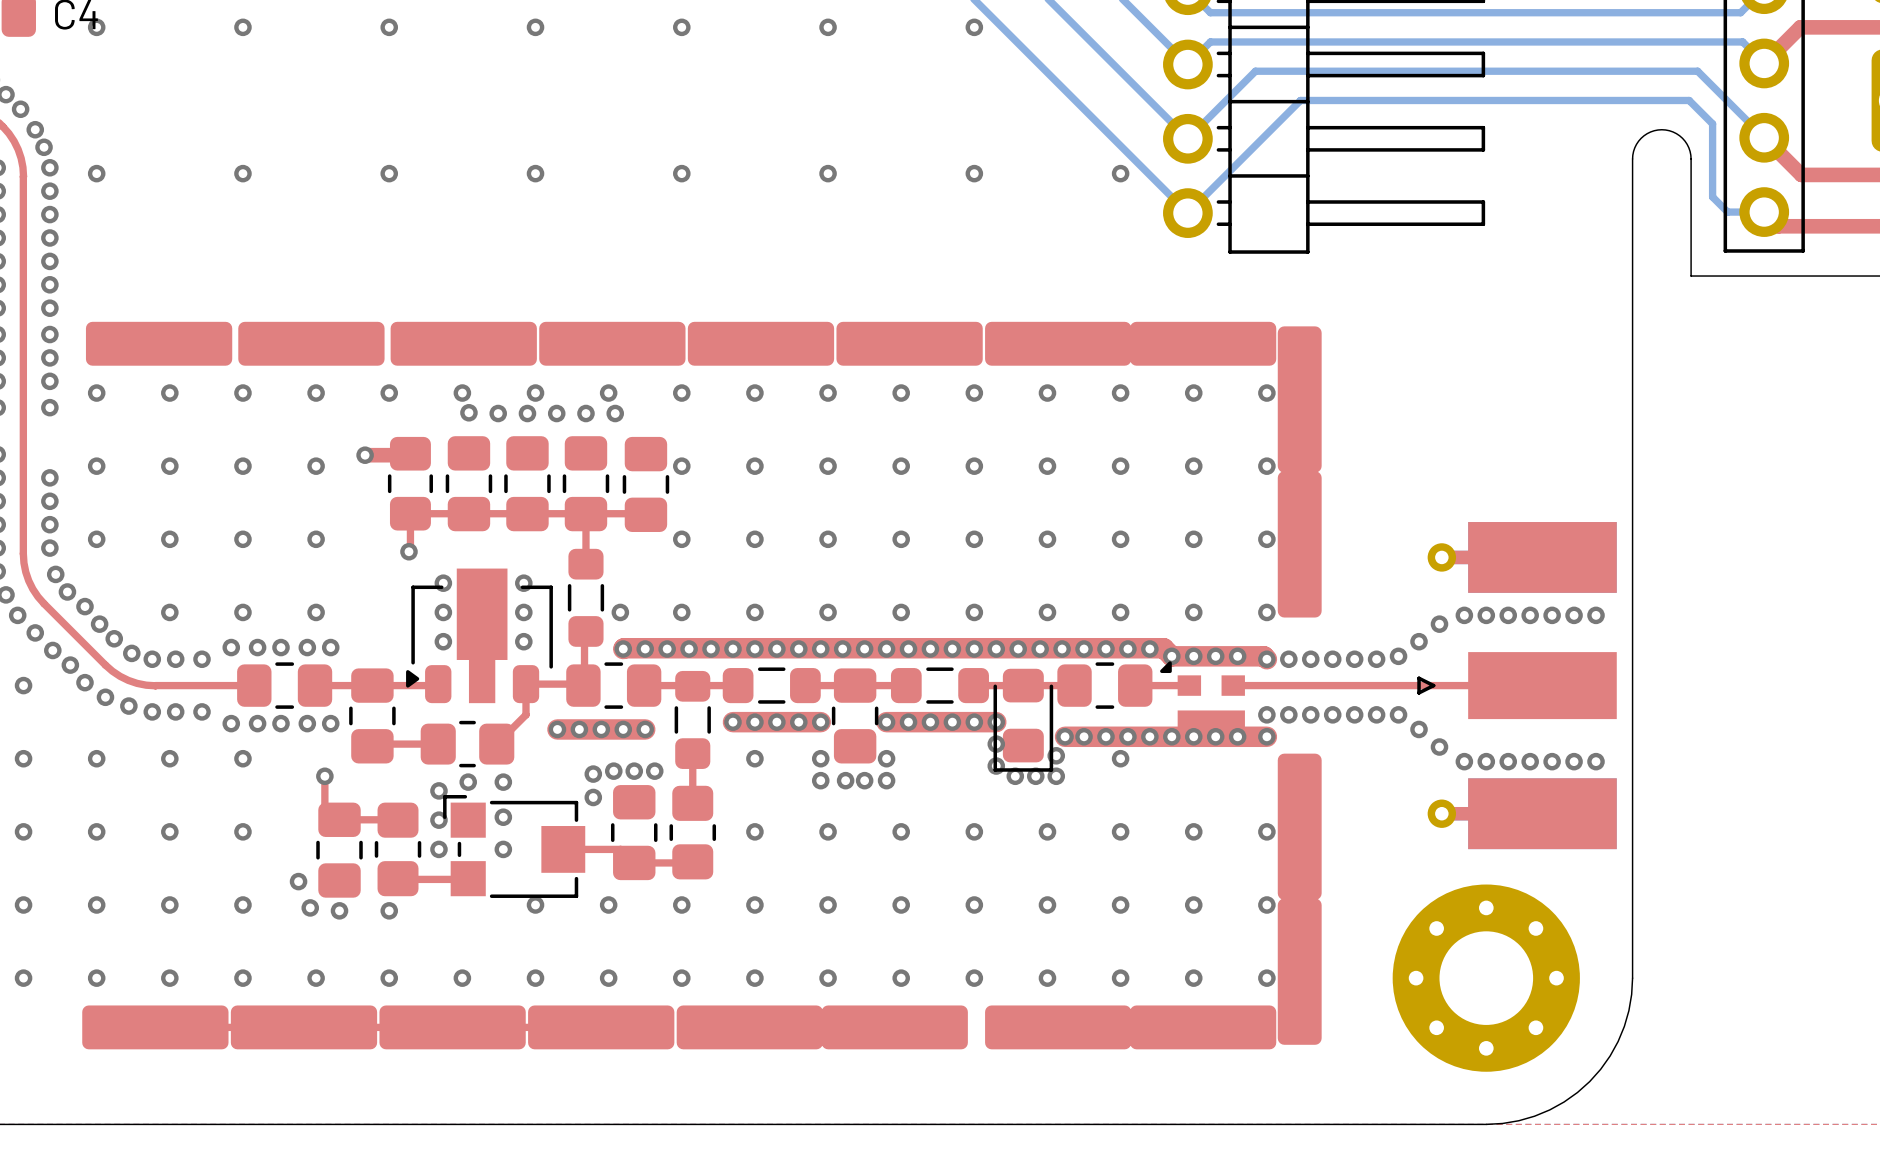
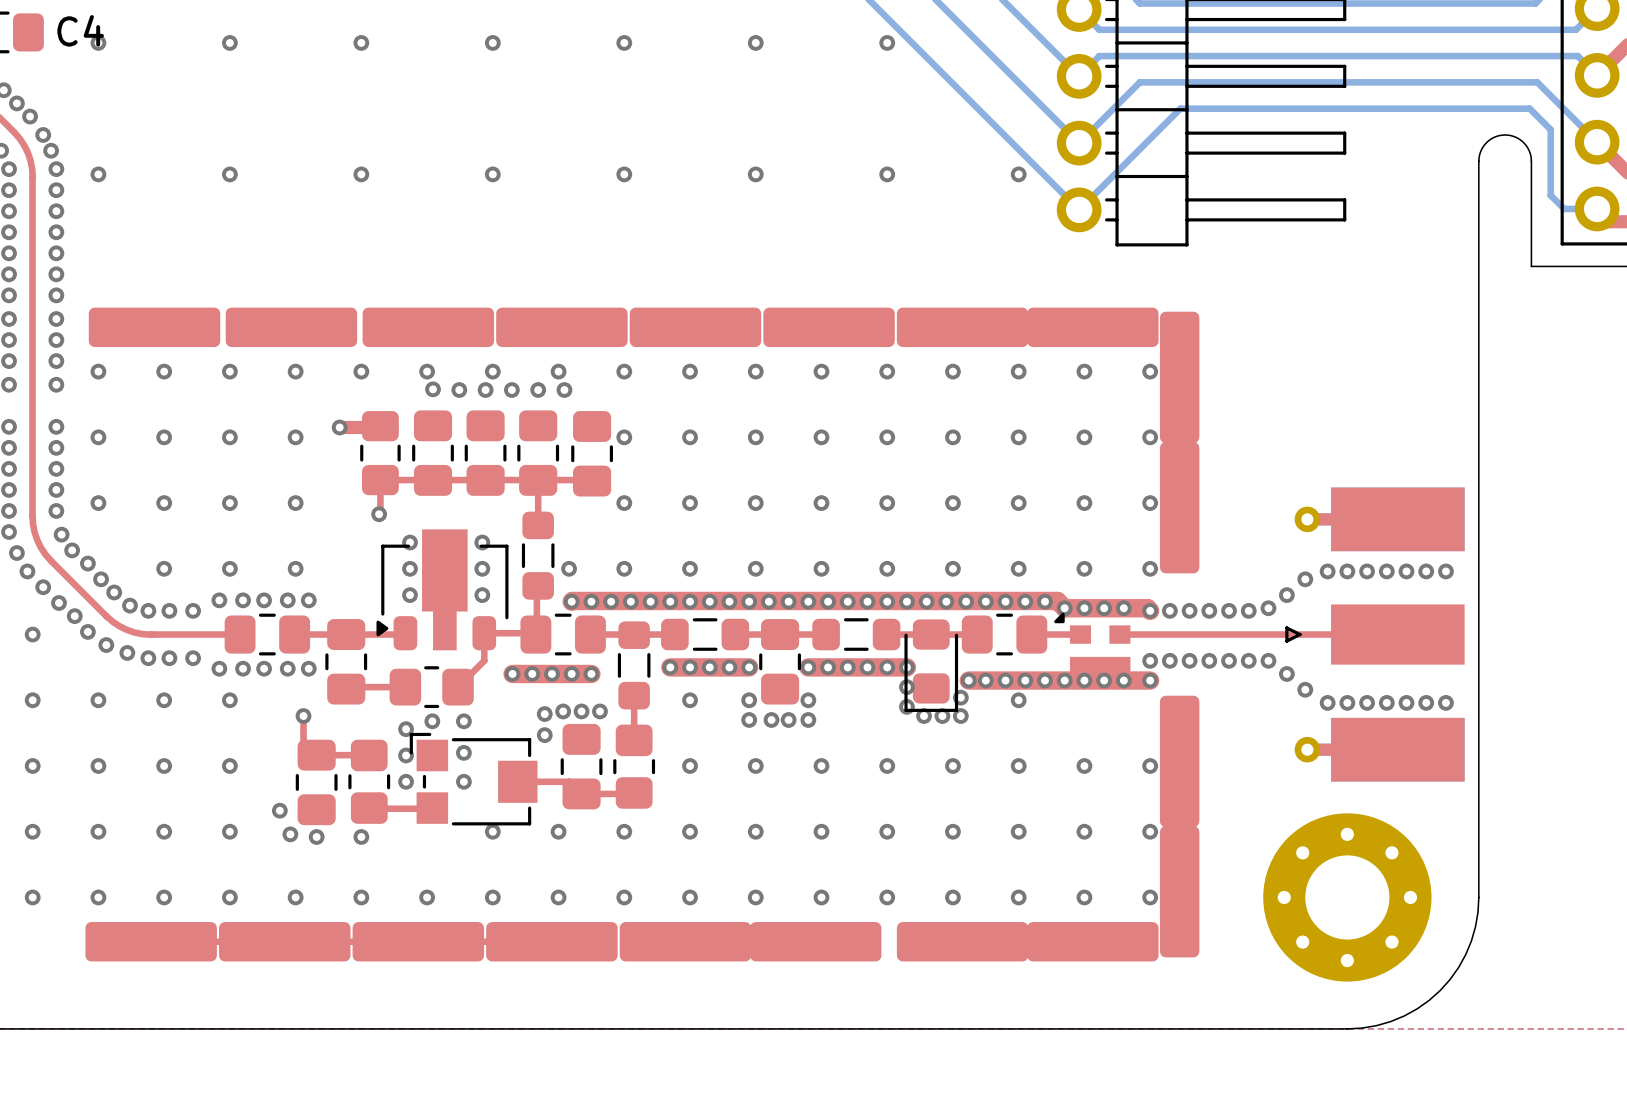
via: none -> (56, 426)

